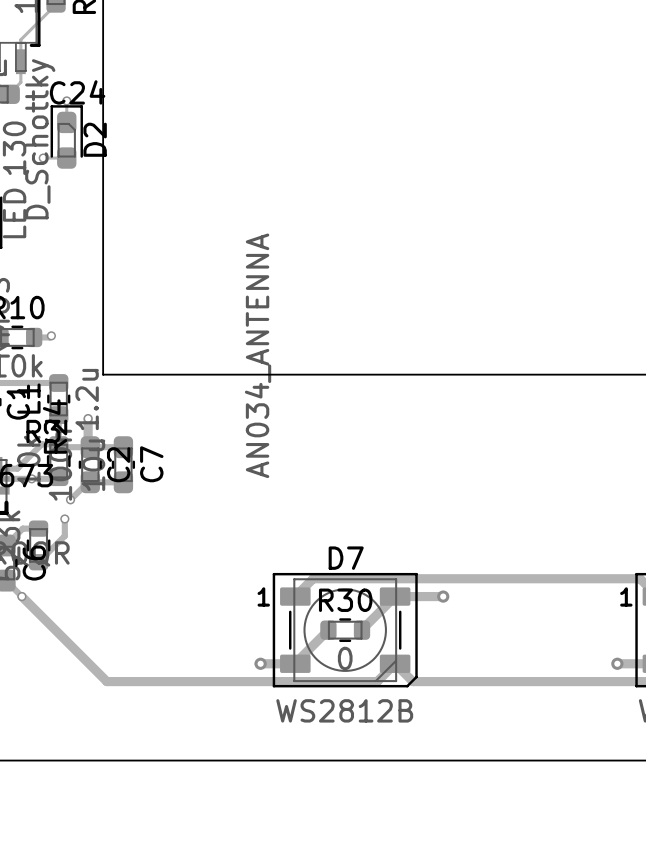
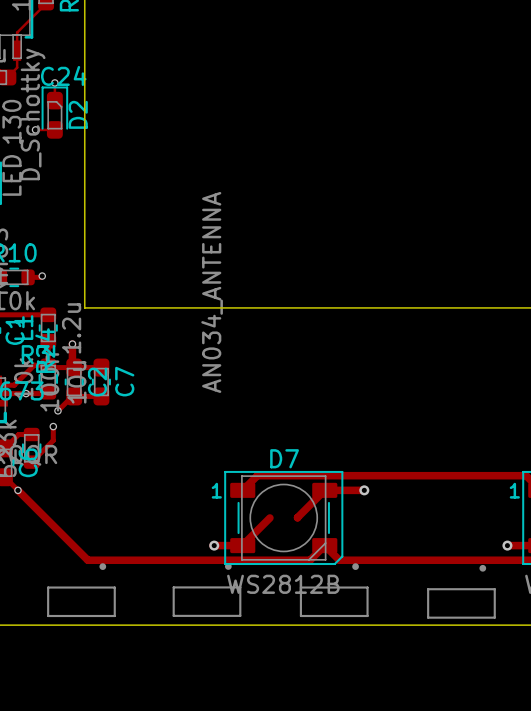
R30: 0 (345, 630) -> none
part: none -> (81, 590)
part: none -> (207, 590)
part: none -> (334, 590)
part: none -> (461, 591)

